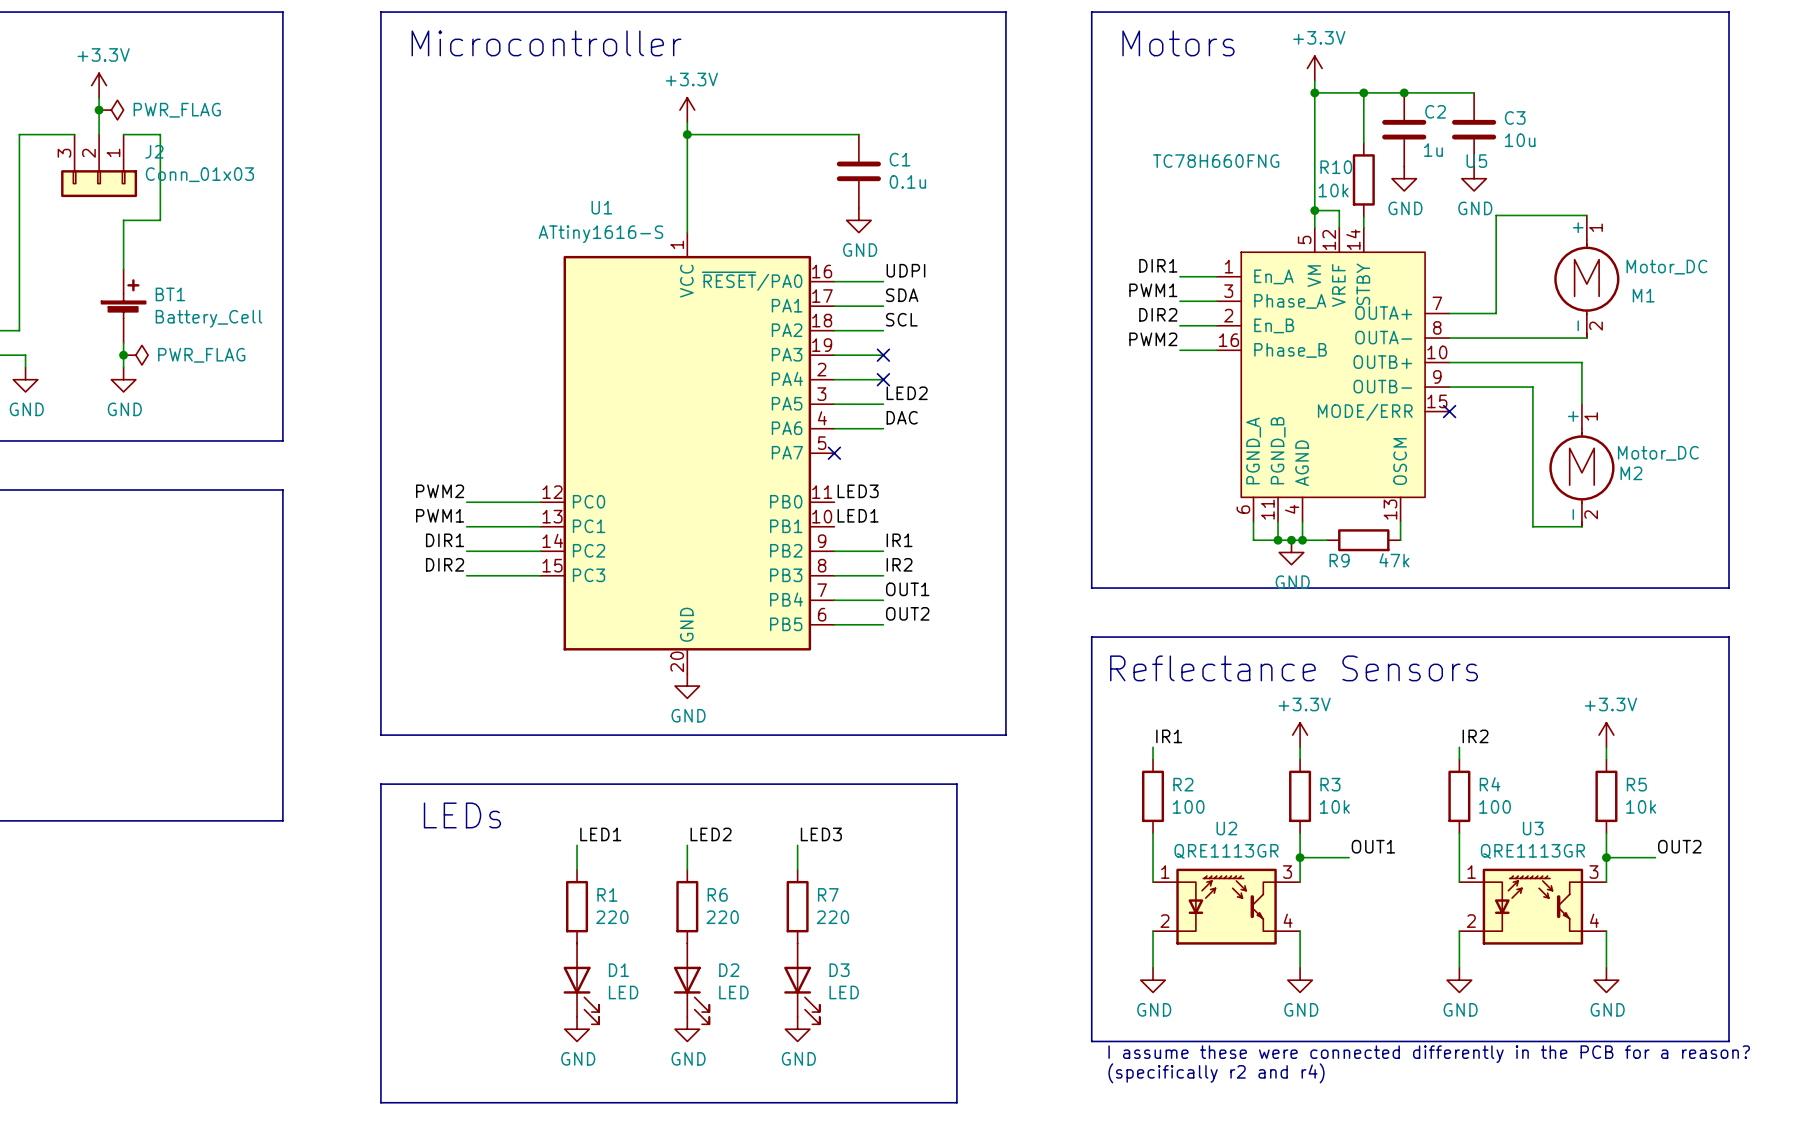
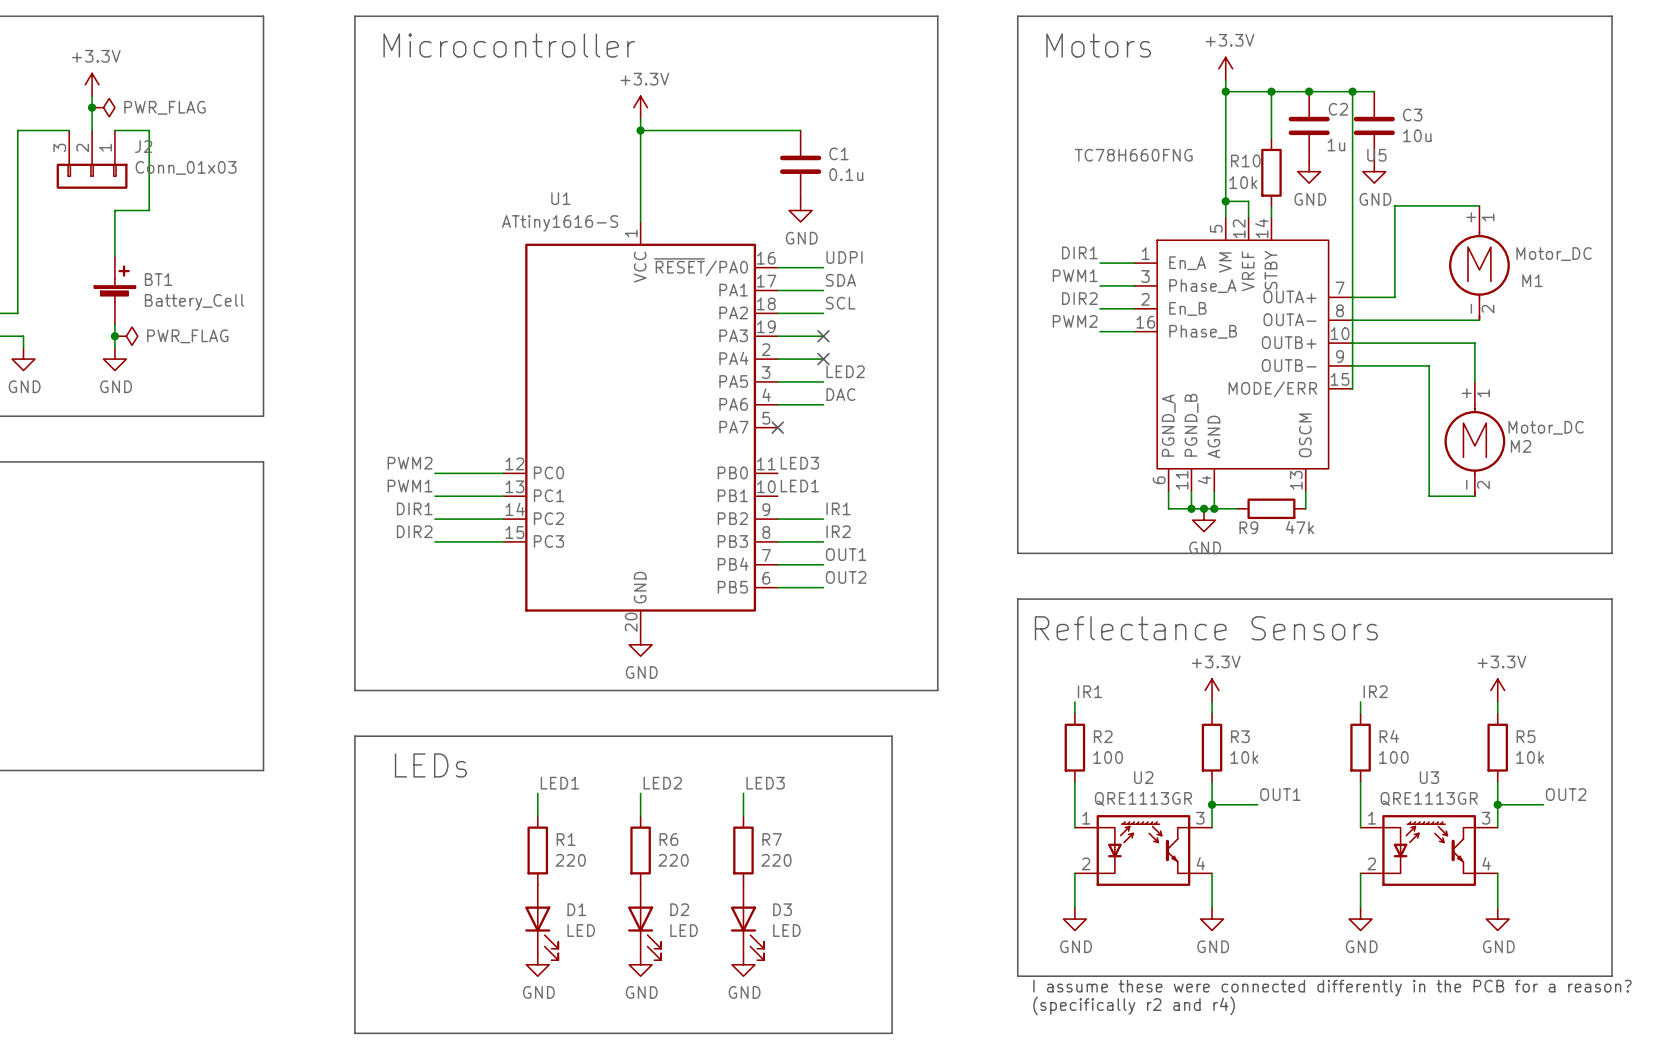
wire: none -> (1352, 91) (1351, 388)
junction: none -> (1352, 91)
no-connect mark: (1449, 411) -> none

